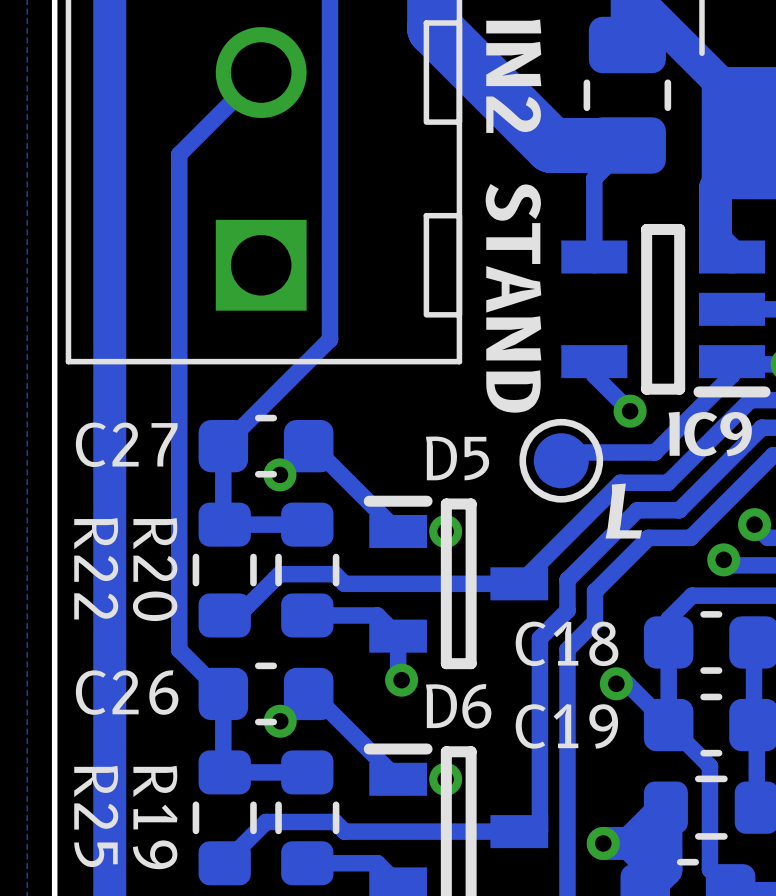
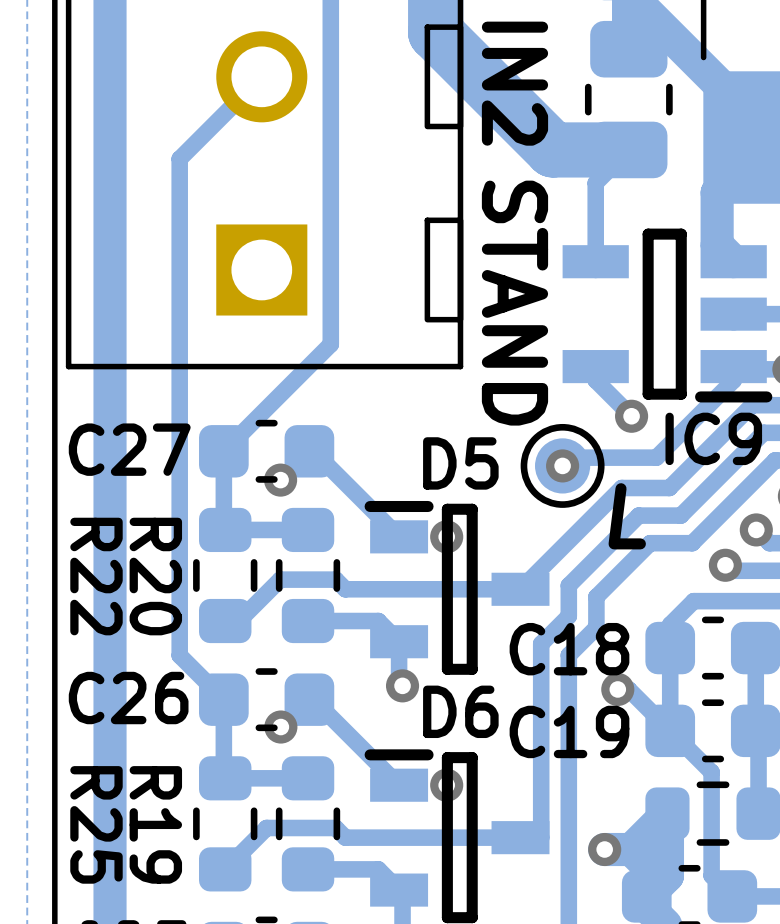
via: none -> (562, 465)

